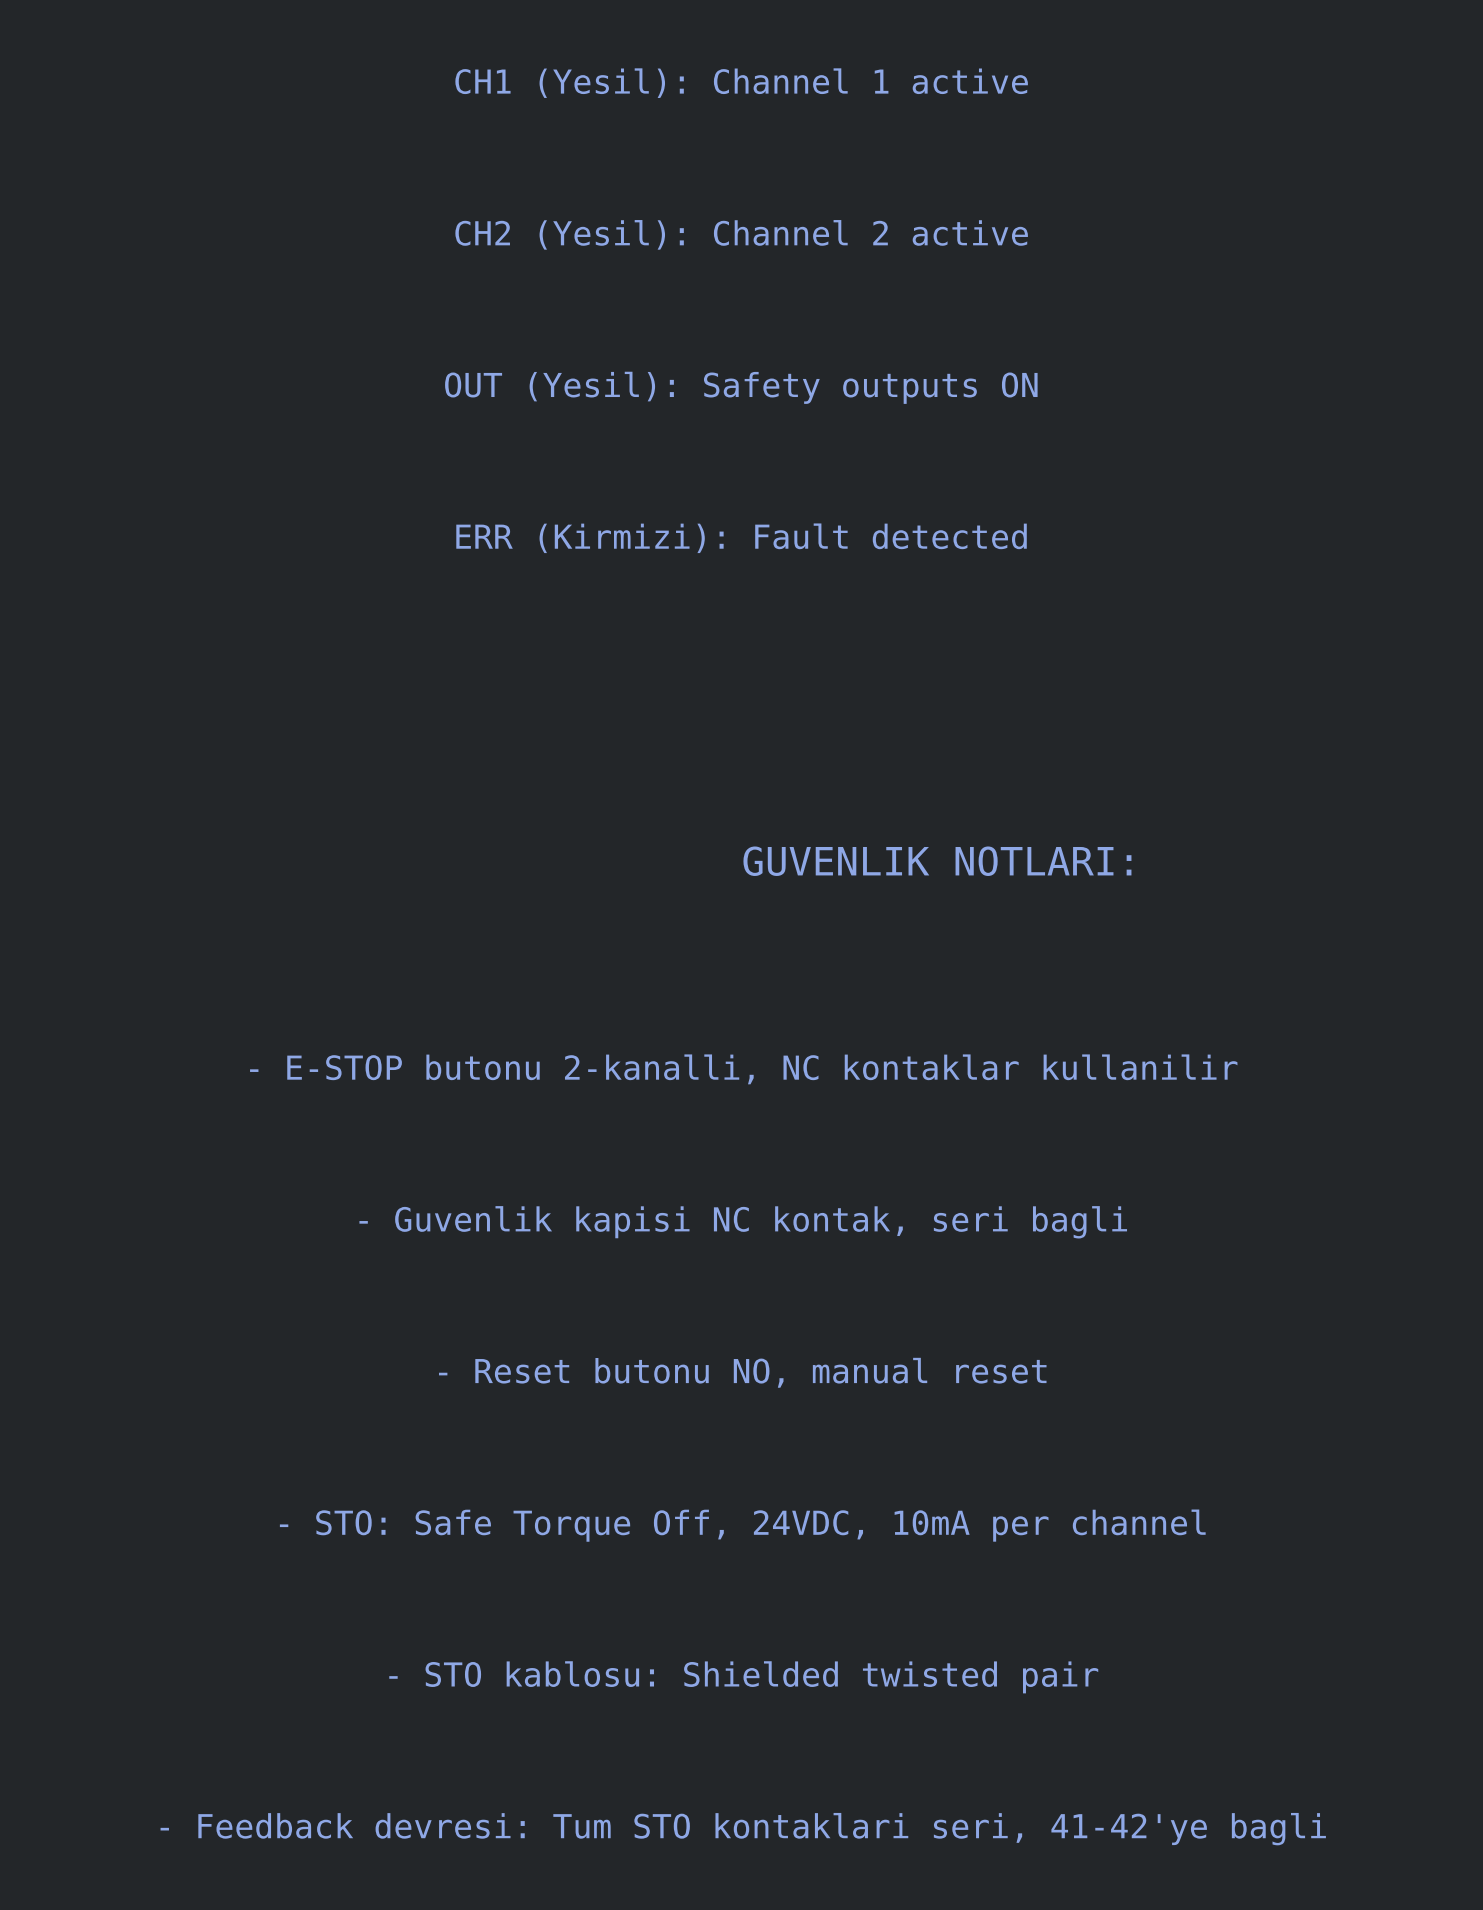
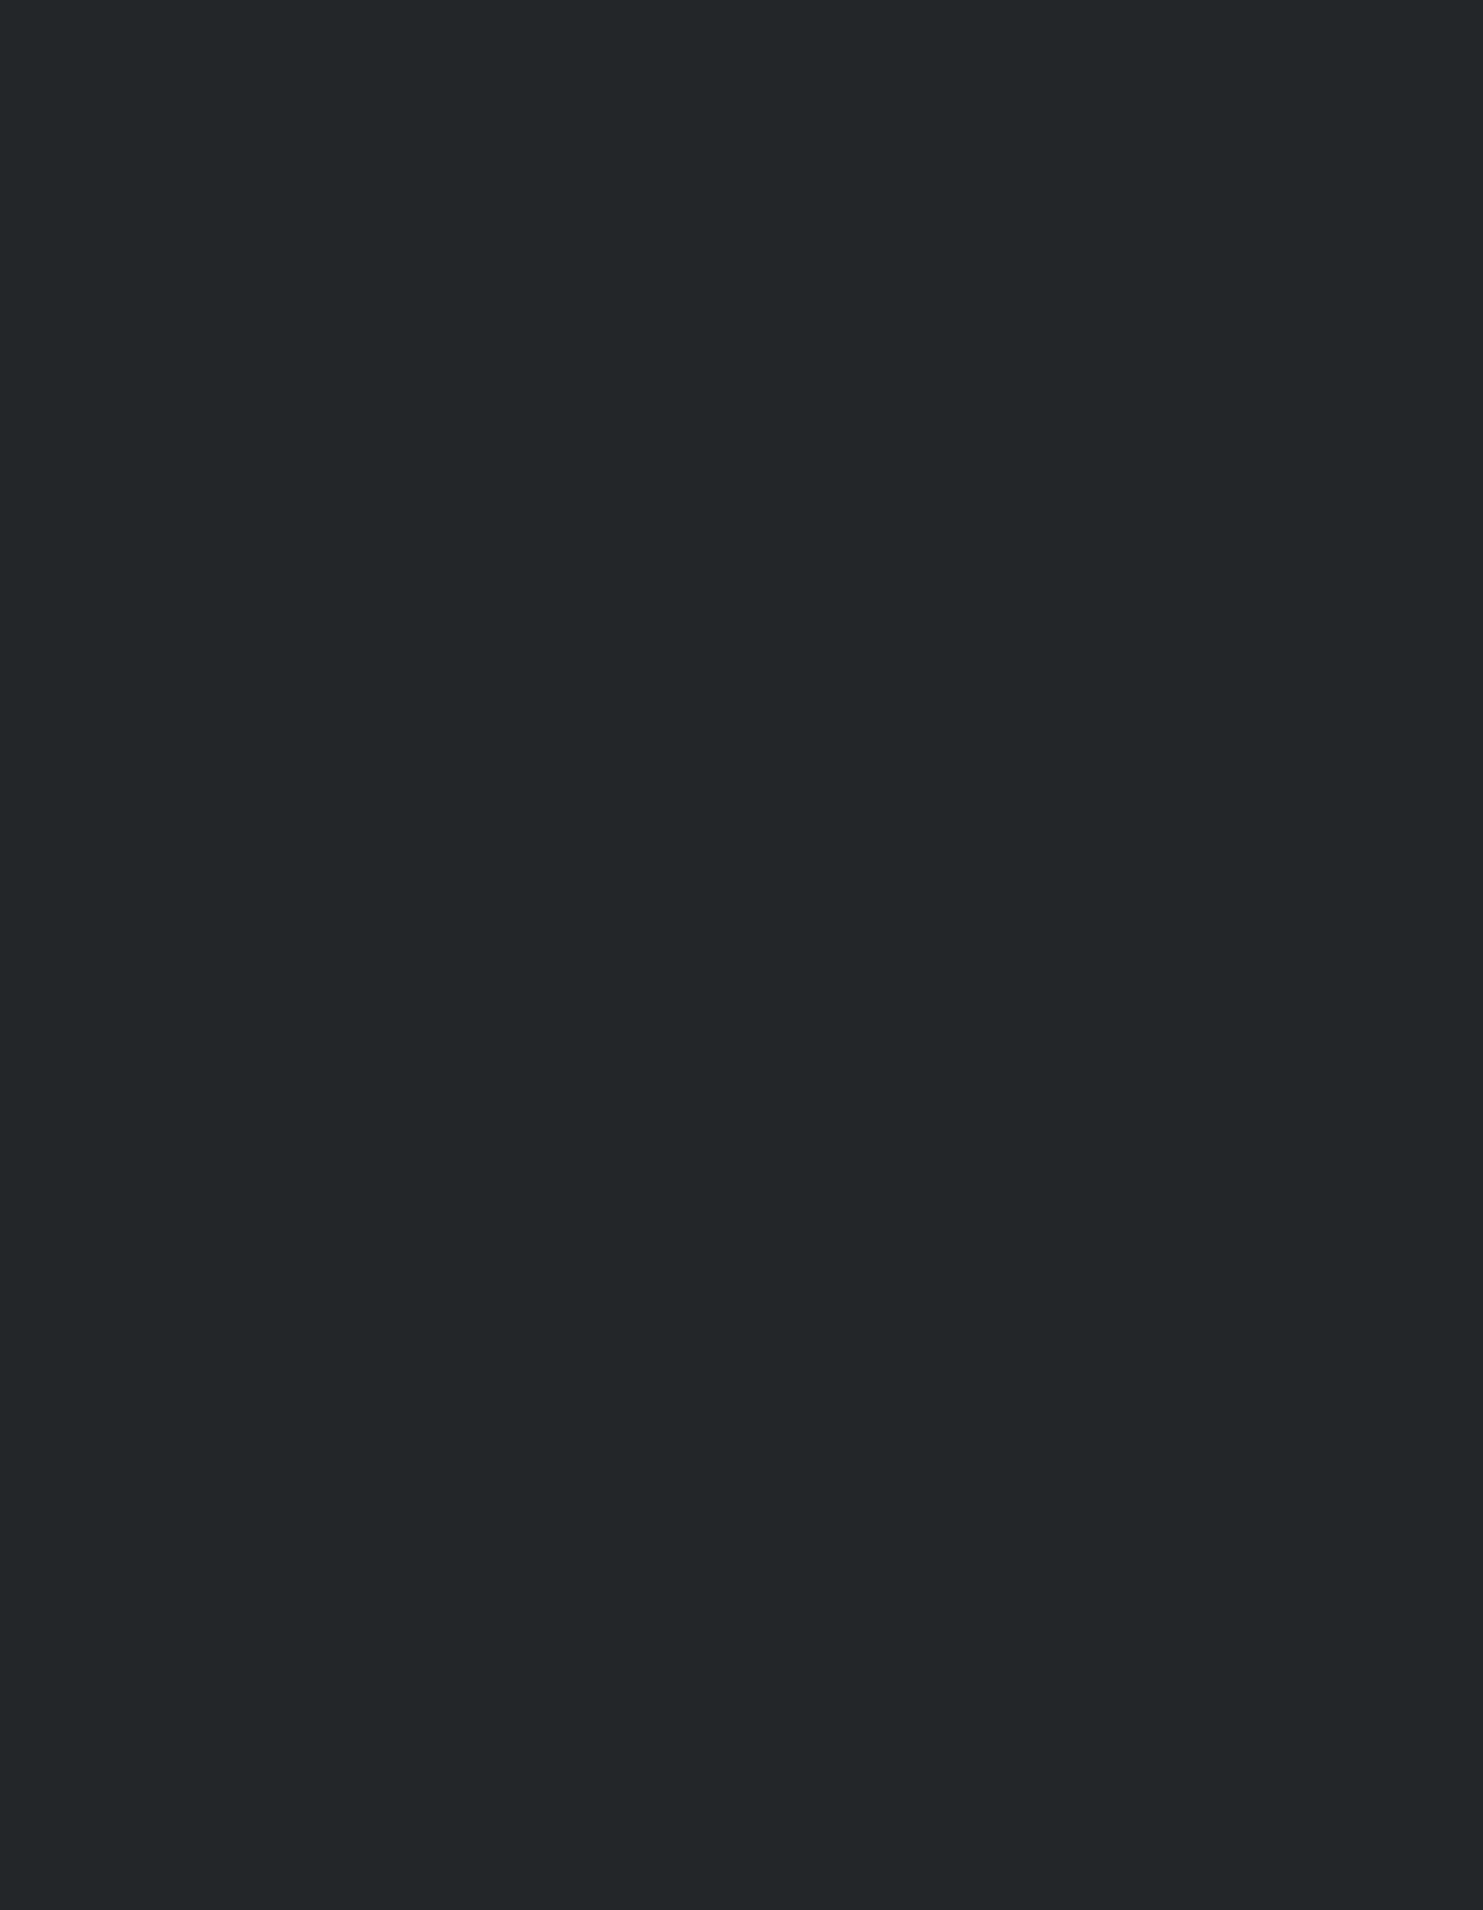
text: CH1 (Yesil): Channel 1 active (741, 83) -> none
text: CH2 (Yesil): Channel 2 active (741, 234) -> none
text: OUT (Yesil): Safety outputs ON (741, 387) -> none
text: ERR (Kirmizi): Fault detected (741, 538) -> none
text: GUVENLIK NOTLARI: (937, 861) -> none
text: - E-STOP butonu 2-kanalli, NC kontaklar kullanilir (743, 1069) -> none
text: - Guvenlik kapisi NC kontak, seri bagli (743, 1222) -> none
text: - Reset butonu NO, manual reset (742, 1372) -> none
text: - STO: Safe Torque Off, 24VDC, 10mA per channel (742, 1525) -> none
text: - STO kablosu: Shielded twisted pair (743, 1677) -> none
text: - Feedback devresi: Tum STO kontaklari seri, 41-42'ye bagli (743, 1829) -> none

